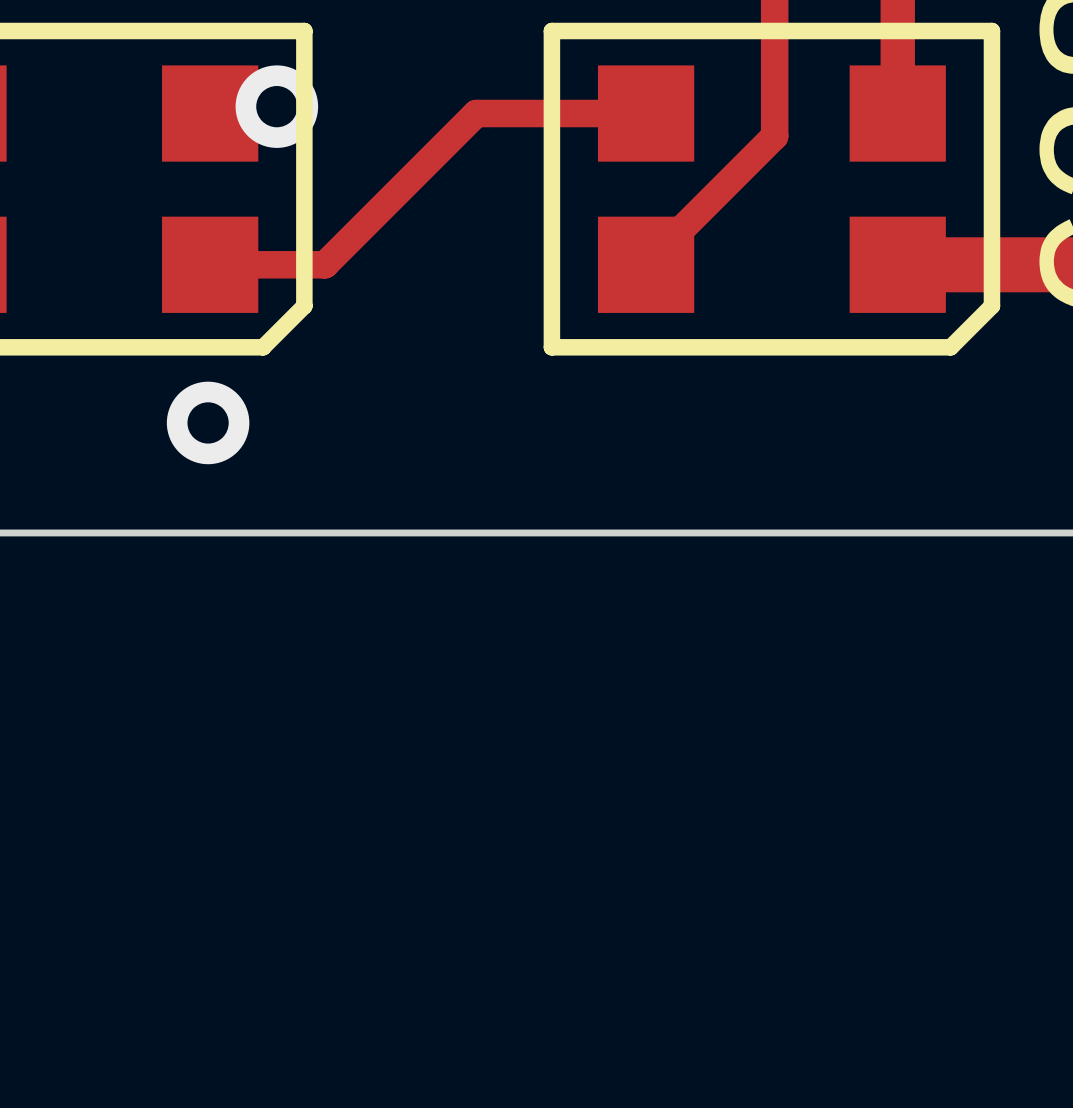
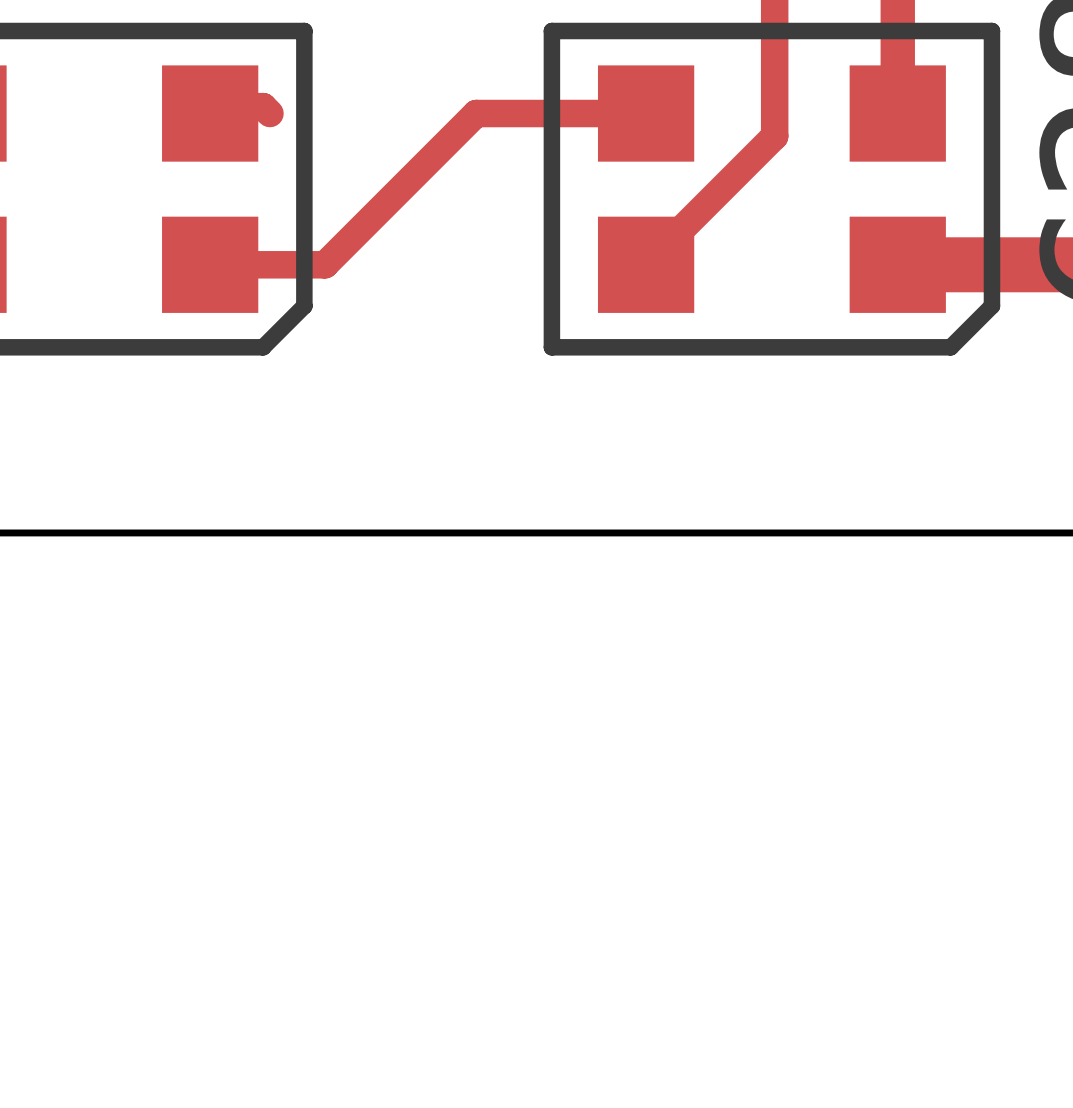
via: (276, 106) -> none
via: (208, 422) -> none

